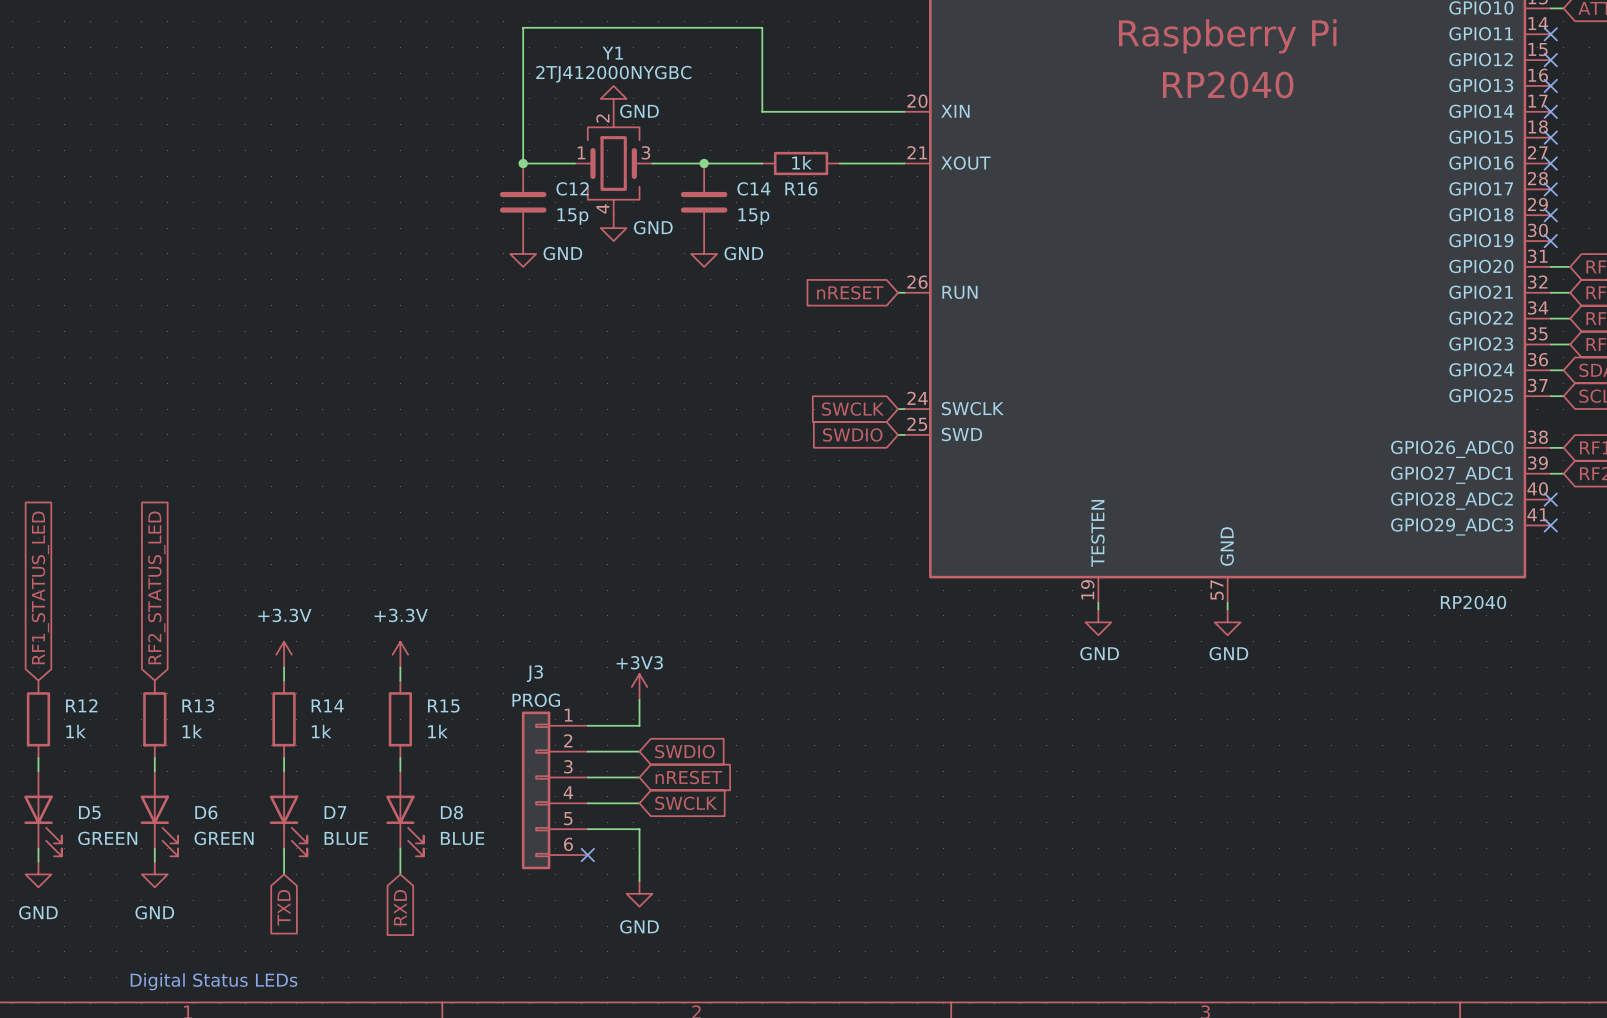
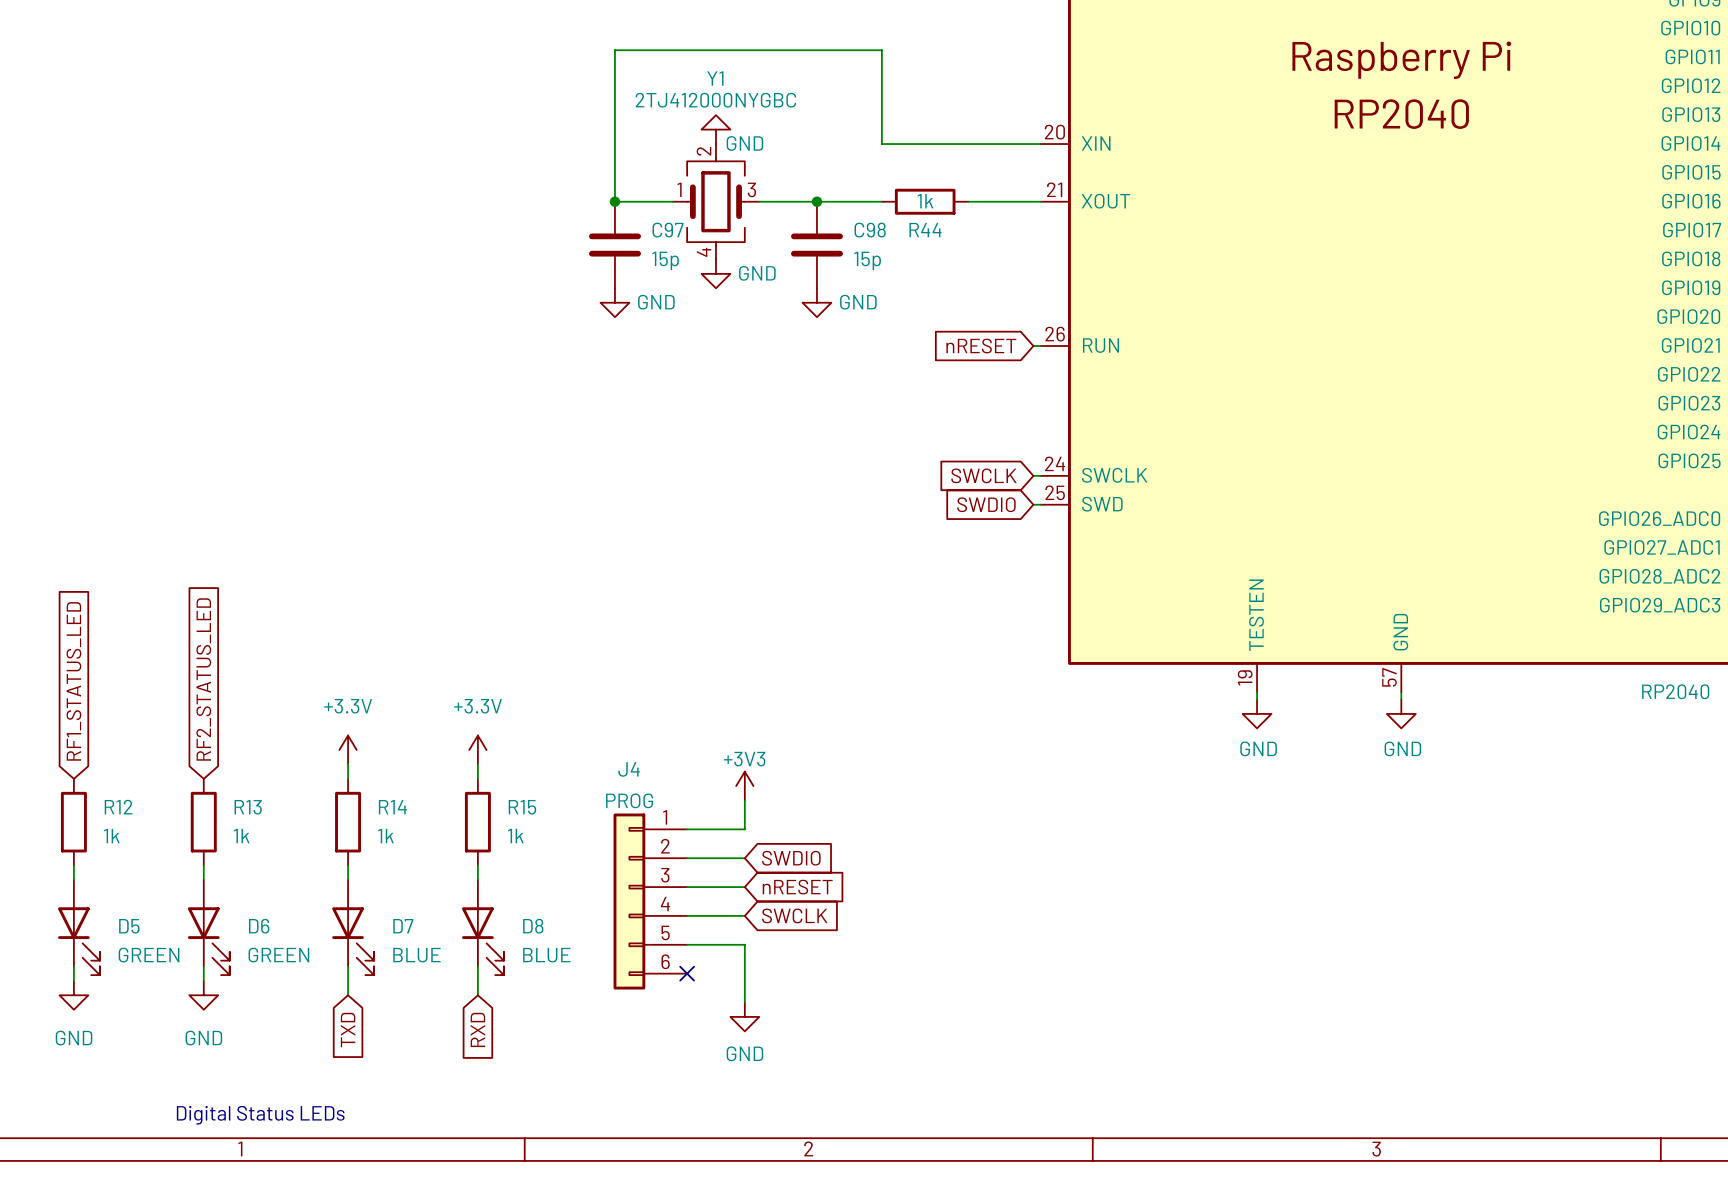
C12 name: C12 (572, 188) -> C97 (668, 230)
C14 name: C14 (753, 188) -> C98 (870, 230)
R16 name: R16 (801, 188) -> R44 (925, 230)
J3 name: J3 (534, 673) -> J4 (629, 769)

